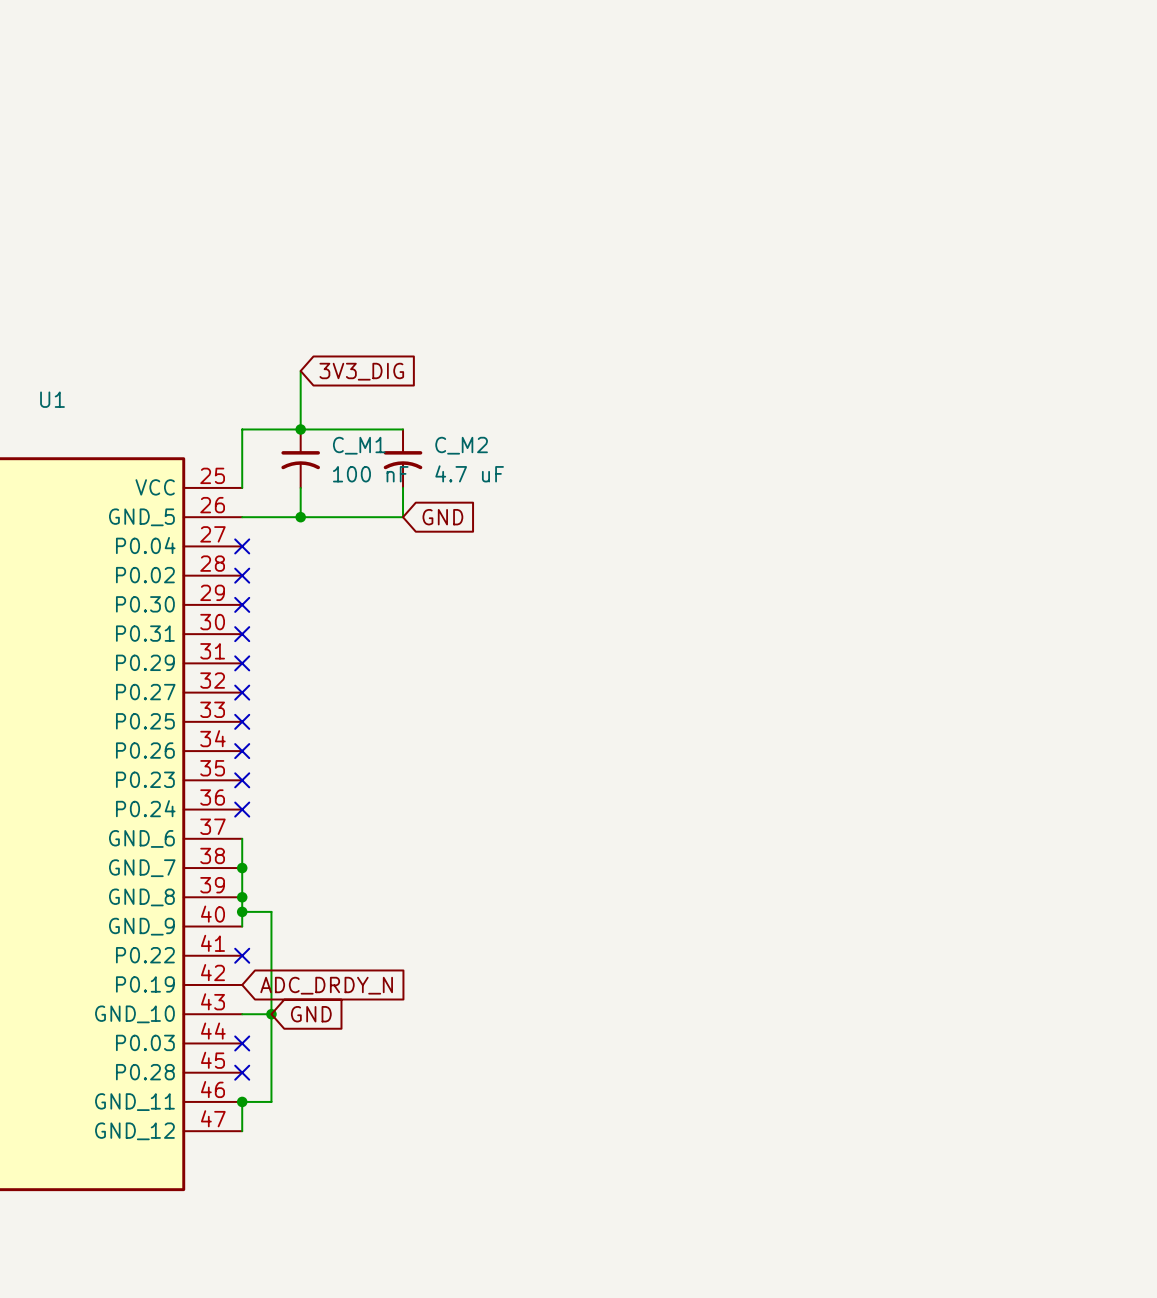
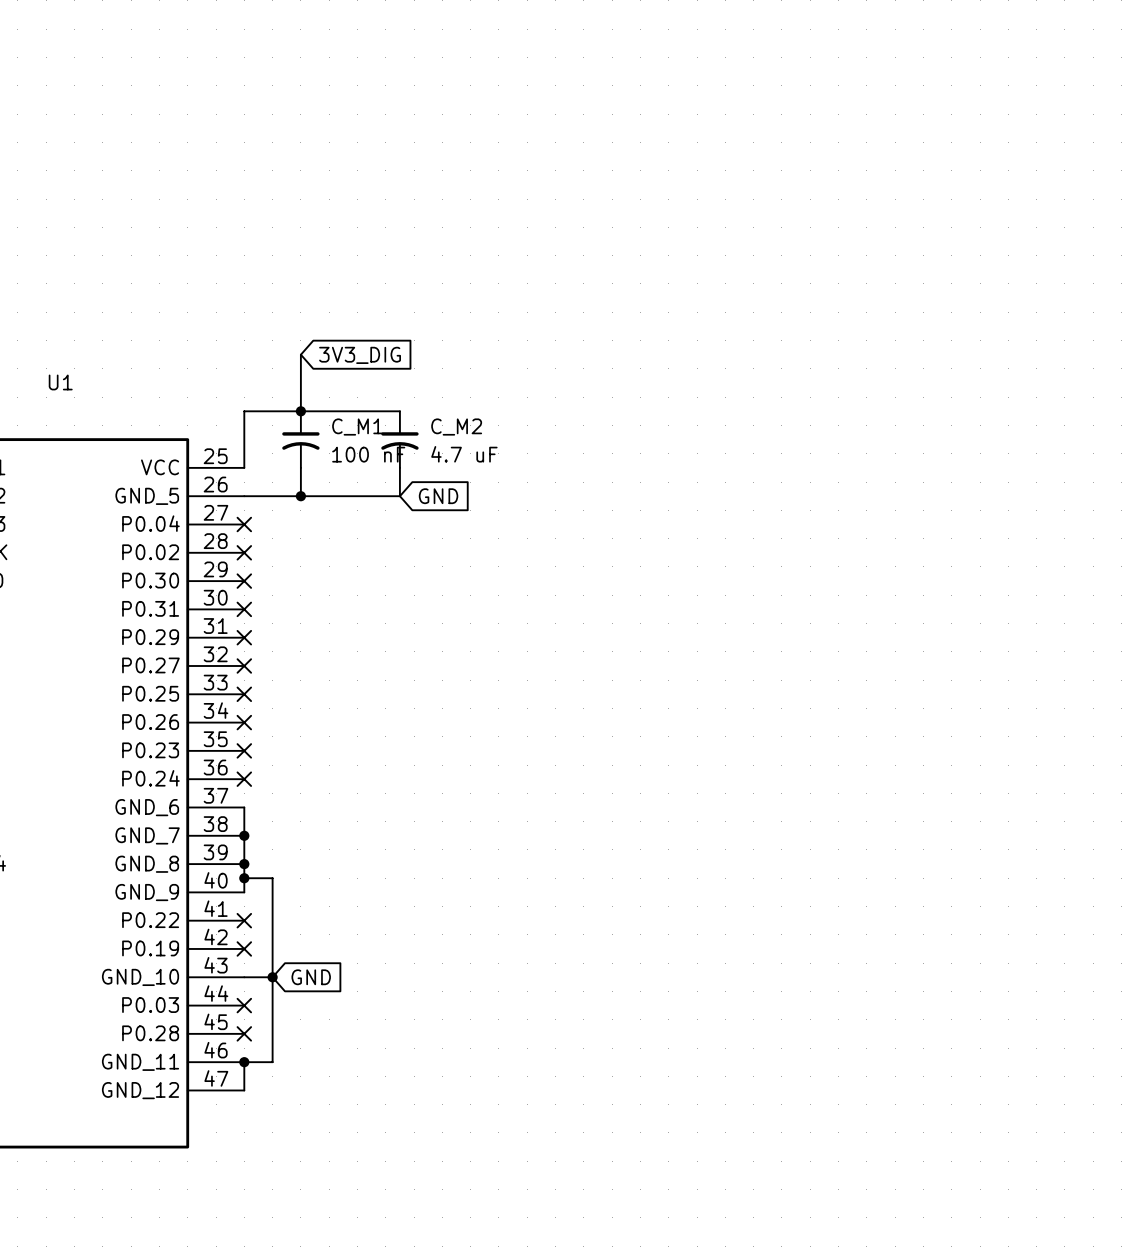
no-connect mark: none -> (244, 948)
global label: ADC_DRDY_N (326, 985) -> none

